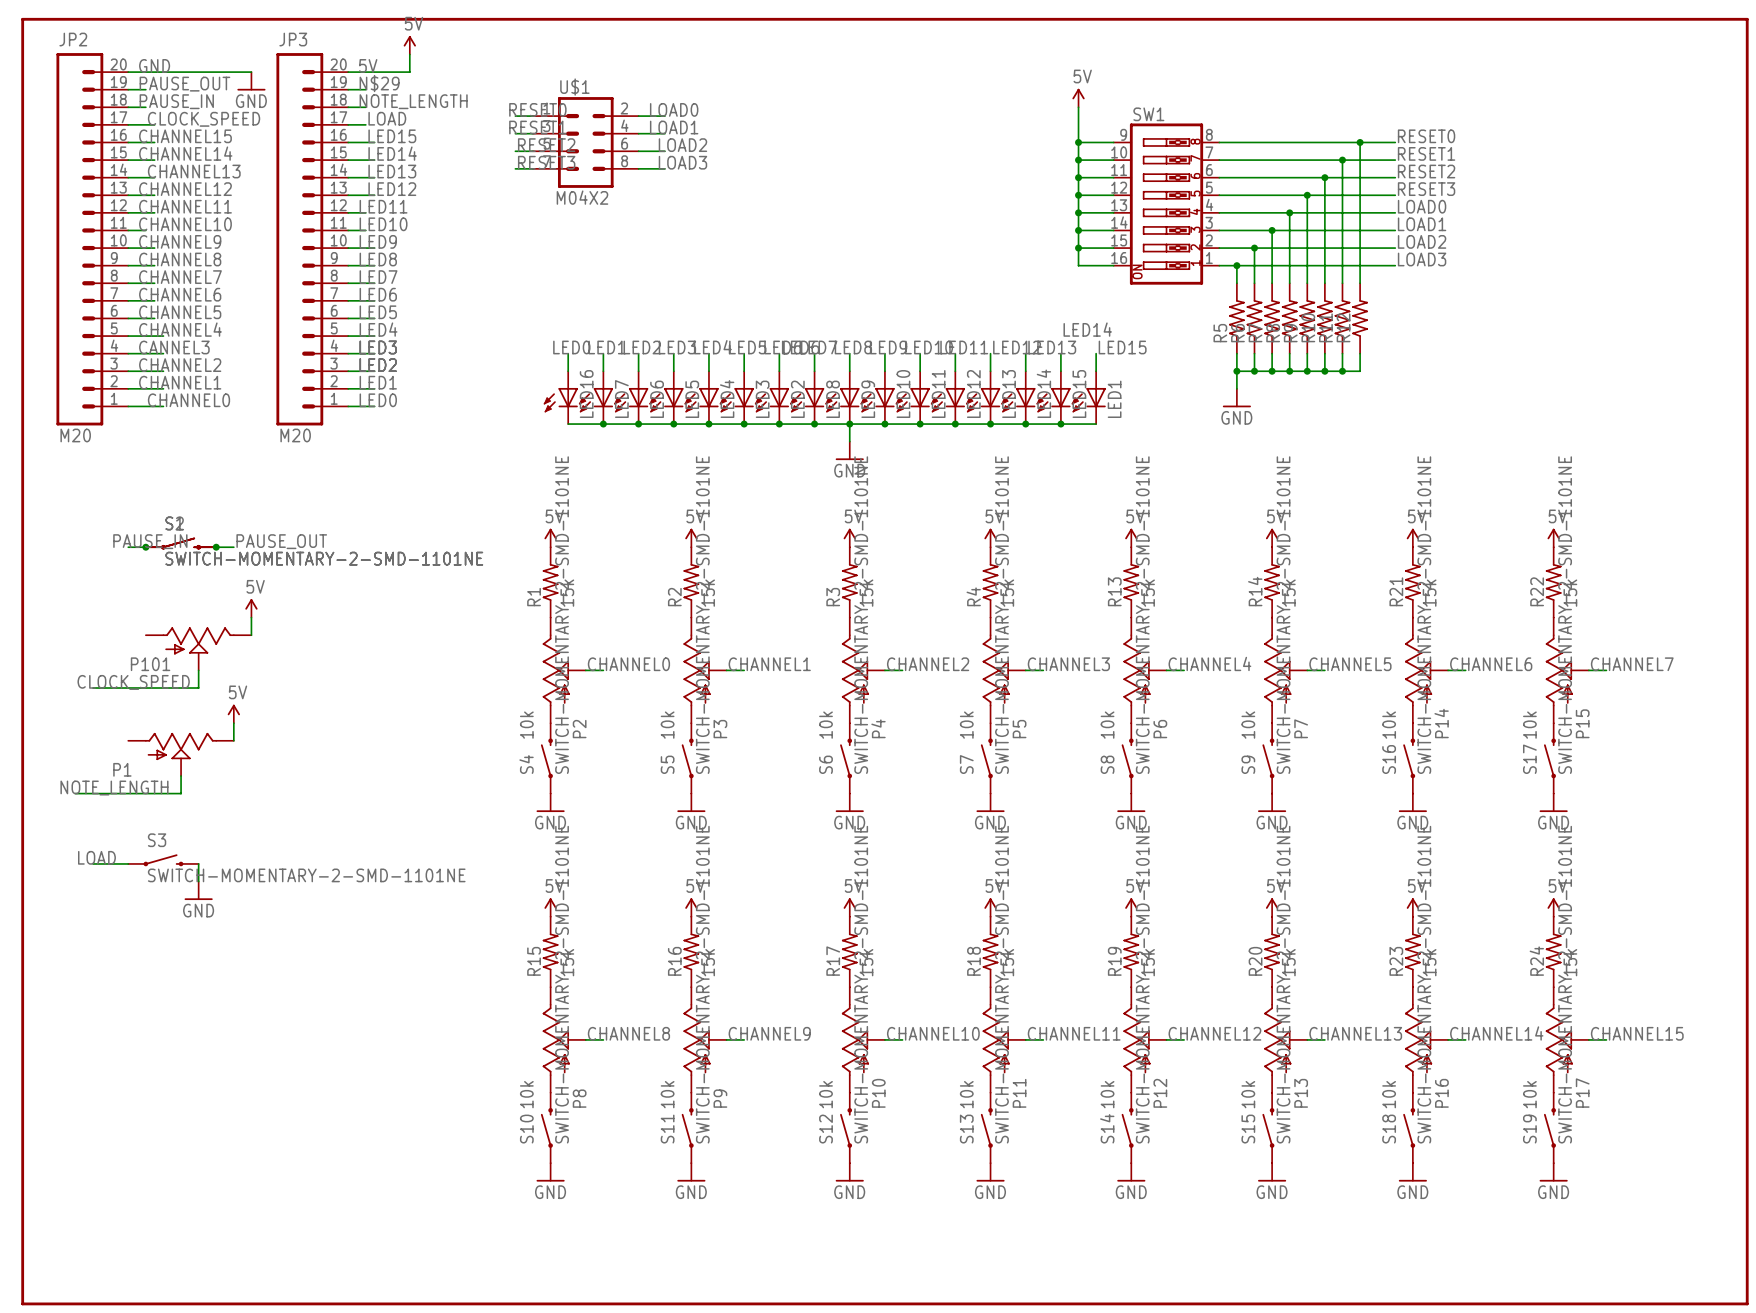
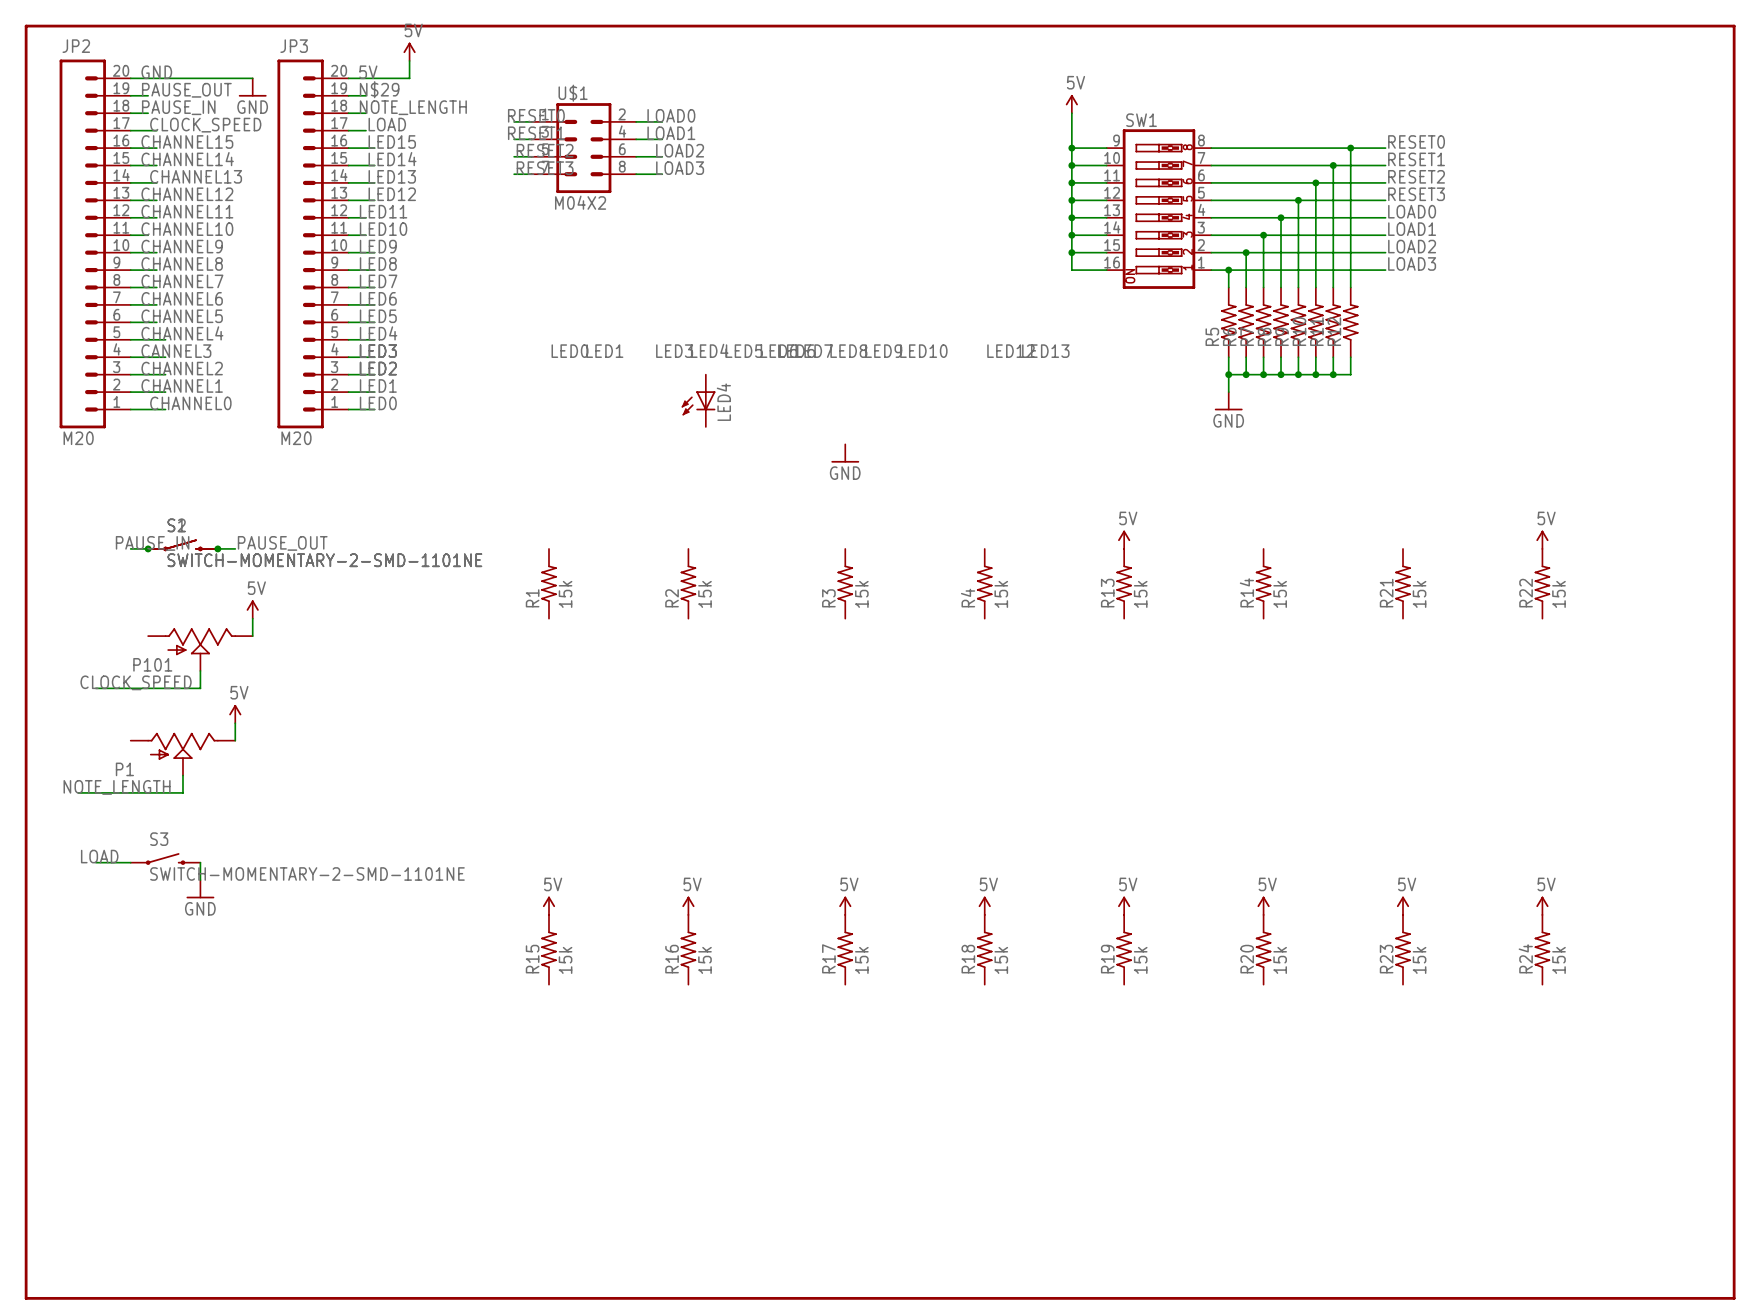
label: LED14 (1087, 329) -> none
label: LED2 (642, 347) -> none
label: LED11 (964, 347) -> none
label: LED15 (1122, 347) -> none
wire: (568, 353) (568, 371) -> none
wire: (603, 353) (603, 371) -> none
wire: (638, 353) (638, 371) -> none
wire: (673, 353) (673, 371) -> none
wire: (708, 353) (708, 371) -> none
wire: (744, 353) (744, 371) -> none
wire: (779, 353) (779, 371) -> none
wire: (814, 353) (814, 371) -> none
wire: (849, 353) (849, 371) -> none
wire: (884, 353) (884, 371) -> none
wire: (920, 353) (920, 371) -> none
wire: (955, 353) (955, 371) -> none
wire: (990, 353) (990, 371) -> none
wire: (1025, 353) (1025, 371) -> none
wire: (1060, 353) (1060, 371) -> none
wire: (1096, 353) (1096, 371) -> none
LED16: (560, 397) -> none
LED7: (596, 397) -> none
LED6: (631, 397) -> none
LED5: (666, 397) -> none
LED3: (736, 397) -> none
LED2: (772, 397) -> none
LED8: (807, 397) -> none
LED9: (842, 397) -> none
LED10: (877, 397) -> none
LED11: (912, 397) -> none
LED12: (948, 397) -> none
LED13: (983, 397) -> none
LED14: (1018, 397) -> none
LED15: (1053, 397) -> none
LED1: (1088, 397) -> none
wire: (568, 424) (1096, 424) -> none
junction: (603, 424) -> none
junction: (638, 424) -> none
junction: (673, 424) -> none
junction: (708, 424) -> none
junction: (744, 424) -> none
junction: (779, 424) -> none
junction: (814, 424) -> none
wire: (849, 424) (849, 441) -> none
junction: (849, 424) -> none
junction: (884, 424) -> none
junction: (920, 424) -> none
junction: (955, 424) -> none
junction: (990, 424) -> none
junction: (1025, 424) -> none
junction: (1060, 424) -> none
power symbol: 5V (550, 537) -> none
power symbol: 5V (691, 537) -> none
power symbol: 5V (849, 537) -> none
power symbol: 5V (990, 537) -> none
power symbol: 5V (1272, 537) -> none
power symbol: 5V (1412, 537) -> none
label: CHANNEL4 (1209, 663) -> none
label: CHANNEL0 (628, 664) -> none
label: CHANNEL1 (769, 664) -> none
label: CHANNEL2 (928, 664) -> none
label: CHANNEL3 (1068, 664) -> none
label: CHANNEL5 (1350, 664) -> none
label: CHANNEL6 (1491, 664) -> none
label: CHANNEL7 (1632, 664) -> none
P2: 10k (564, 670) -> none
wire: (585, 670) (603, 670) -> none
P3: 10k (705, 670) -> none
wire: (726, 670) (744, 670) -> none
P4: 10k (863, 670) -> none
wire: (884, 670) (902, 670) -> none
P5: 10k (1004, 670) -> none
wire: (1025, 670) (1043, 670) -> none
P6: 10k (1144, 670) -> none
wire: (1166, 670) (1184, 670) -> none
P7: 10k (1285, 670) -> none
wire: (1307, 670) (1324, 670) -> none
P14: 10k (1426, 670) -> none
wire: (1448, 670) (1465, 670) -> none
P15: 10k (1567, 670) -> none
wire: (1588, 670) (1606, 670) -> none
S4: SWITCH-MOMENTARY-2-SMD-1101NE (546, 758) -> none
S5: SWITCH-MOMENTARY-2-SMD-1101NE (687, 758) -> none
S6: SWITCH-MOMENTARY-2-SMD-1101NE (846, 758) -> none
S7: SWITCH-MOMENTARY-2-SMD-1101NE (986, 758) -> none
S8: SWITCH-MOMENTARY-2-SMD-1101NE (1127, 758) -> none
S9: SWITCH-MOMENTARY-2-SMD-1101NE (1268, 758) -> none
S16: SWITCH-MOMENTARY-2-SMD-1101NE (1409, 758) -> none
S17: SWITCH-MOMENTARY-2-SMD-1101NE (1549, 758) -> none
power symbol: GND (550, 802) -> none
power symbol: GND (691, 802) -> none
power symbol: GND (849, 802) -> none
power symbol: GND (990, 802) -> none
power symbol: GND (1131, 802) -> none
power symbol: GND (1272, 802) -> none
power symbol: GND (1412, 802) -> none
power symbol: GND (1553, 802) -> none
label: CHANNEL8 (628, 1033) -> none
label: CHANNEL9 (769, 1033) -> none
label: CHANNEL10 (933, 1033) -> none
label: CHANNEL11 (1074, 1033) -> none
label: CHANNEL12 (1214, 1033) -> none
label: CHANNEL13 (1355, 1033) -> none
label: CHANNEL14 (1496, 1033) -> none
label: CHANNEL15 (1637, 1033) -> none
P8: 10k (564, 1039) -> none
wire: (585, 1039) (603, 1039) -> none
P9: 10k (705, 1039) -> none
wire: (726, 1039) (744, 1039) -> none
P10: 10k (863, 1039) -> none
wire: (884, 1039) (902, 1039) -> none
P11: 10k (1004, 1039) -> none
wire: (1025, 1039) (1043, 1039) -> none
P12: 10k (1144, 1039) -> none
wire: (1166, 1039) (1184, 1039) -> none
P13: 10k (1285, 1039) -> none
wire: (1307, 1039) (1324, 1039) -> none
P16: 10k (1426, 1039) -> none
wire: (1448, 1039) (1465, 1039) -> none
P17: 10k (1567, 1039) -> none
wire: (1588, 1039) (1606, 1039) -> none
S10: SWITCH-MOMENTARY-2-SMD-1101NE (546, 1127) -> none
S11: SWITCH-MOMENTARY-2-SMD-1101NE (687, 1127) -> none
S12: SWITCH-MOMENTARY-2-SMD-1101NE (846, 1127) -> none
S13: SWITCH-MOMENTARY-2-SMD-1101NE (986, 1127) -> none
S14: SWITCH-MOMENTARY-2-SMD-1101NE (1127, 1127) -> none
S15: SWITCH-MOMENTARY-2-SMD-1101NE (1268, 1127) -> none
S18: SWITCH-MOMENTARY-2-SMD-1101NE (1409, 1127) -> none
S19: SWITCH-MOMENTARY-2-SMD-1101NE (1549, 1127) -> none
power symbol: GND (550, 1172) -> none
power symbol: GND (691, 1172) -> none
power symbol: GND (849, 1172) -> none
power symbol: GND (990, 1172) -> none
power symbol: GND (1131, 1172) -> none
power symbol: GND (1272, 1172) -> none
power symbol: GND (1412, 1172) -> none
power symbol: GND (1553, 1172) -> none

